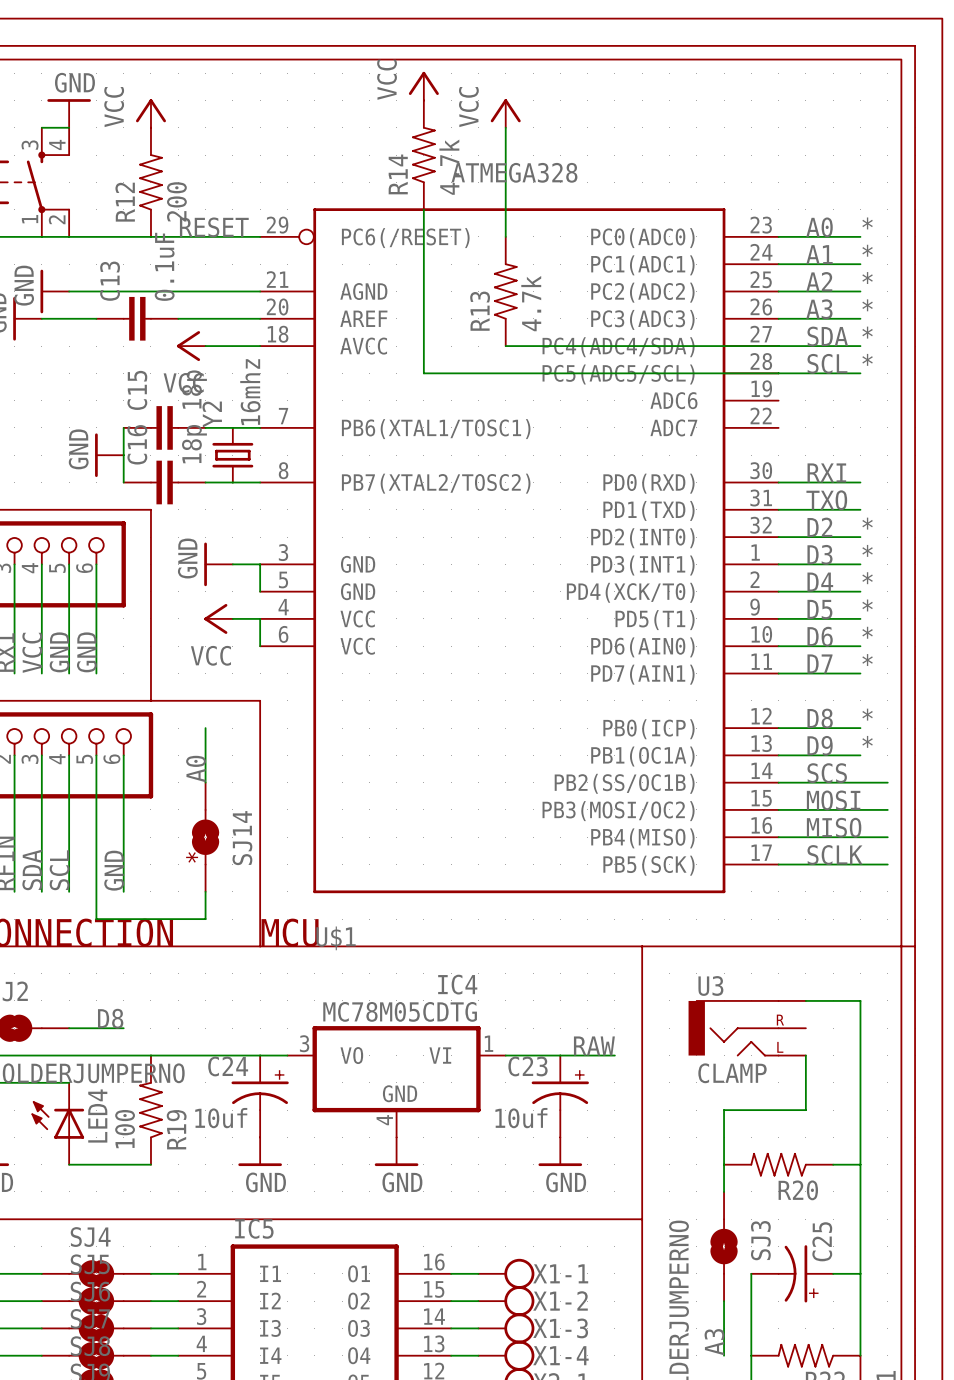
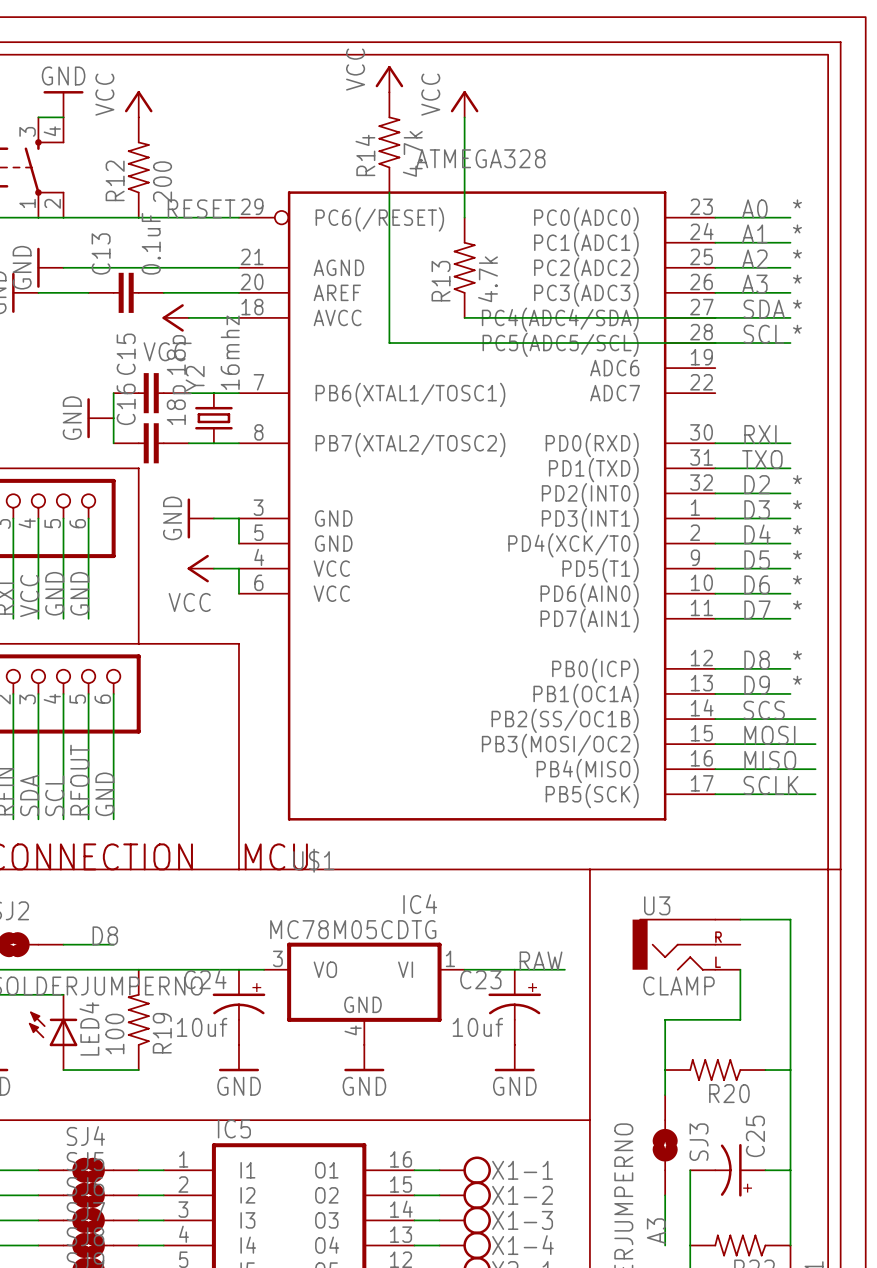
wire: (205, 728) (205, 782) -> none
label: A0 (196, 769) -> none
SJ14: (205, 837) -> none
label: none -> RFOUT (79, 780)
text: * (192, 857) -> none
wire: (96, 891) (96, 919) (205, 919) (205, 891) -> none

